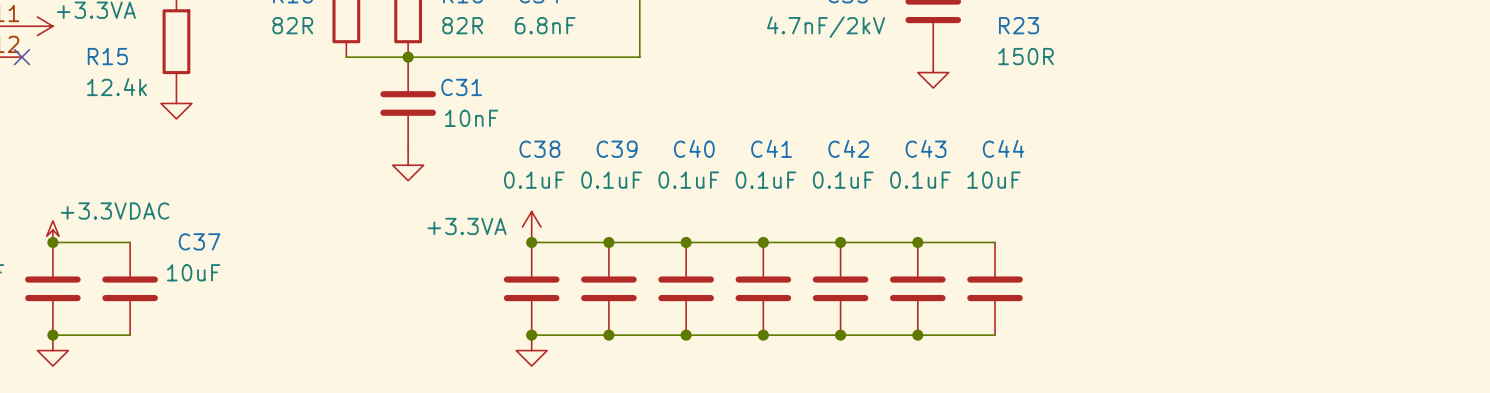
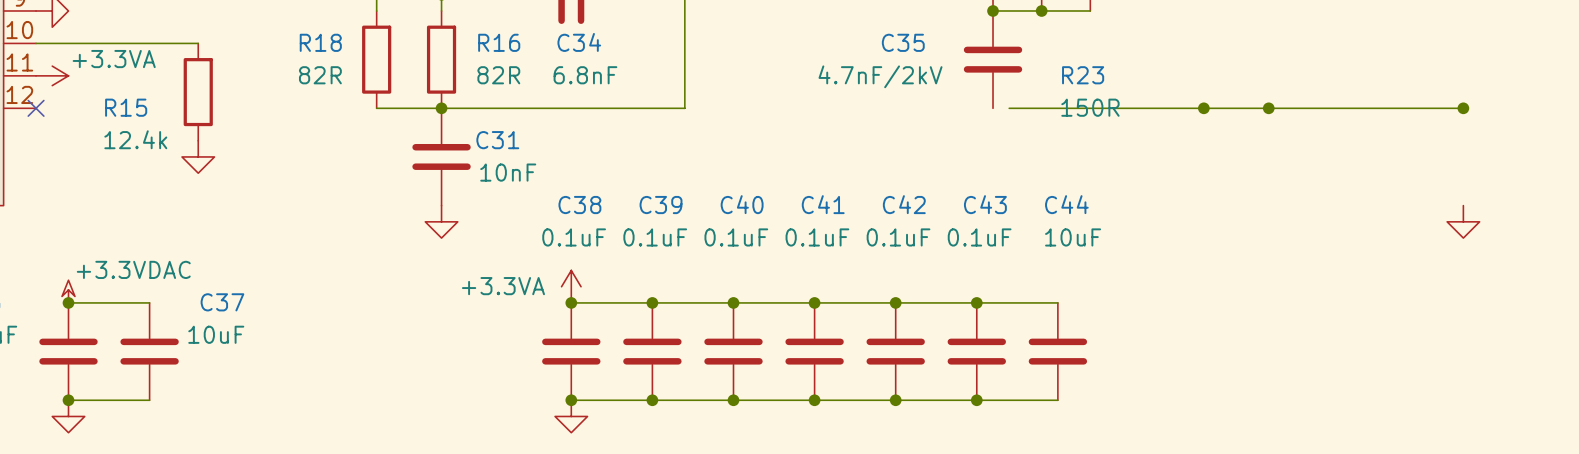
wire: none -> (1009, 108) (1463, 108)
junction: none -> (1203, 108)
junction: none -> (1268, 108)
junction: none -> (1463, 108)
power symbol: (933, 72) -> none
power symbol: none -> (1463, 221)
C44 value position: 10uF (994, 180) -> 10uF (1073, 237)

